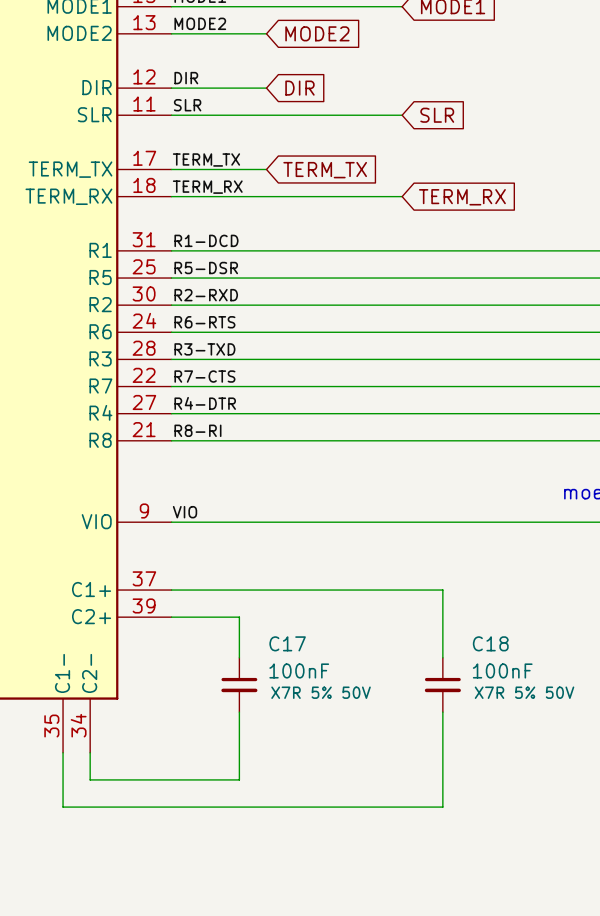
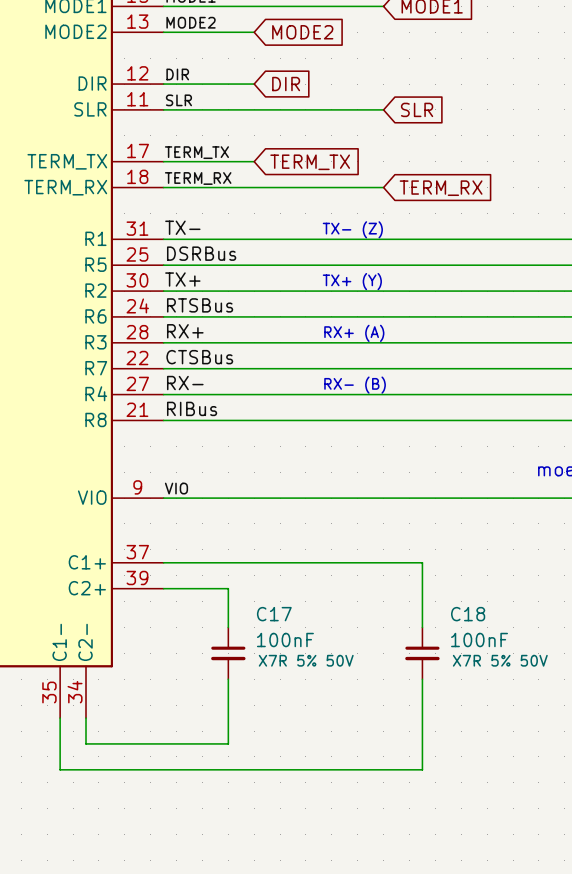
label: R1-DCD (206, 240) -> TX- (182, 227)
text: none -> TX- (Z) (352, 229)
label: R5-DSR (206, 268) -> DSRBus (201, 253)
label: R2-RXD (206, 295) -> TX+ (182, 279)
text: none -> TX+ (Y) (352, 281)
label: R6-RTS (204, 322) -> RTSBus (200, 305)
label: R3-TXD (204, 349) -> RX+ (185, 331)
text: none -> RX+ (A) (354, 333)
label: R7-CTS (204, 376) -> CTSBus (199, 357)
label: R4-DTR (205, 403) -> RX- (185, 383)
text: none -> RX- (B) (355, 385)
label: R8-RI (197, 430) -> RIBus (192, 408)

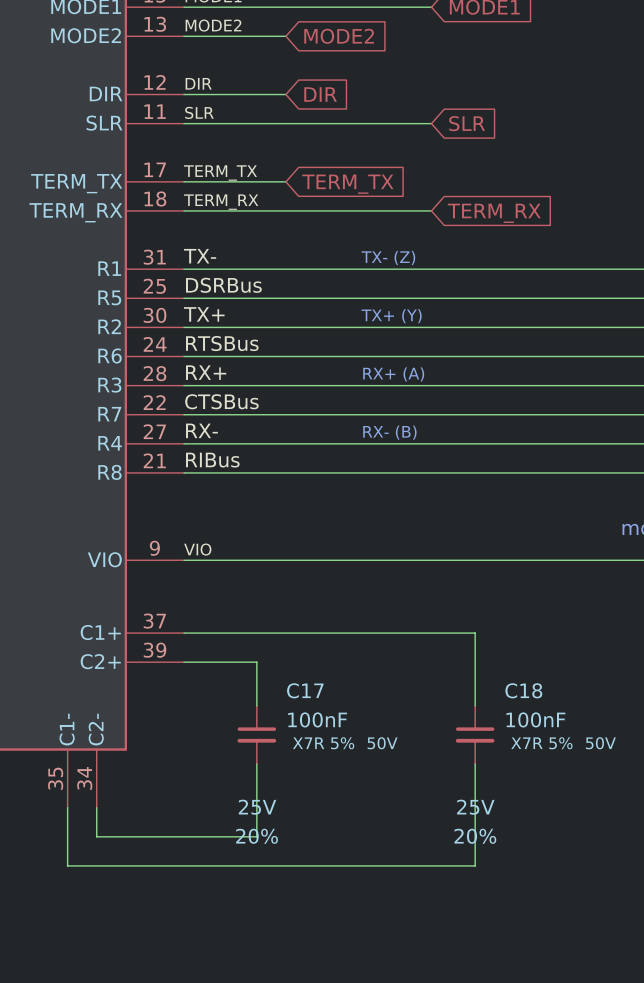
C17 text: none -> 25V (257, 807)
C18 text: none -> 25V (475, 807)
C17 text: none -> 20% (257, 836)
C18 text: none -> 20% (475, 836)

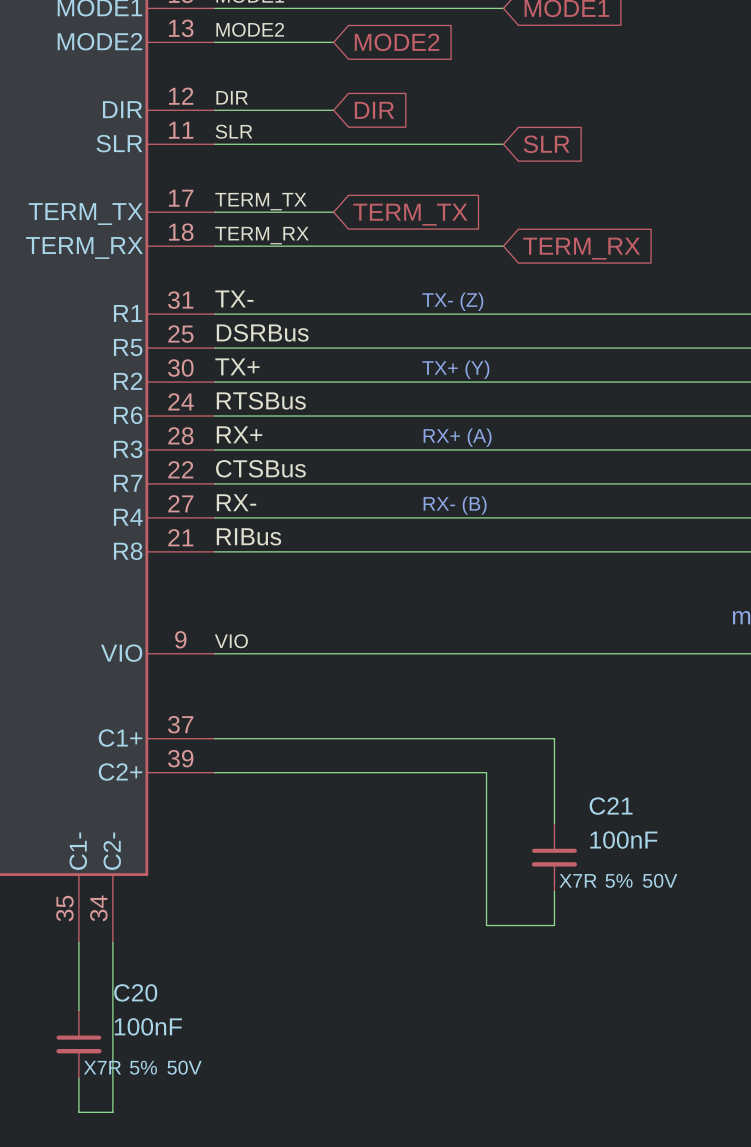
wire: (256, 662) (256, 705) -> (299, 772) (486, 772) (486, 925) (554, 925)
C18 name: C18 (523, 690) -> C21 (611, 806)
C17: 100nF (256, 734) -> none
C18 text: X7R 5% (541, 743) -> X7R (578, 880)
C18 text: 50V (600, 743) -> none
wire: (256, 764) (256, 836) (96, 836) -> (78, 1078) (78, 1112) (112, 1112) (112, 976)
wire: (475, 793) (475, 865) (67, 865) -> none
C18 text: 25V (475, 807) -> 50V (660, 880)
C18 text: 20% (475, 836) -> 5% (619, 880)
C20: none -> 100nF (78, 1044)

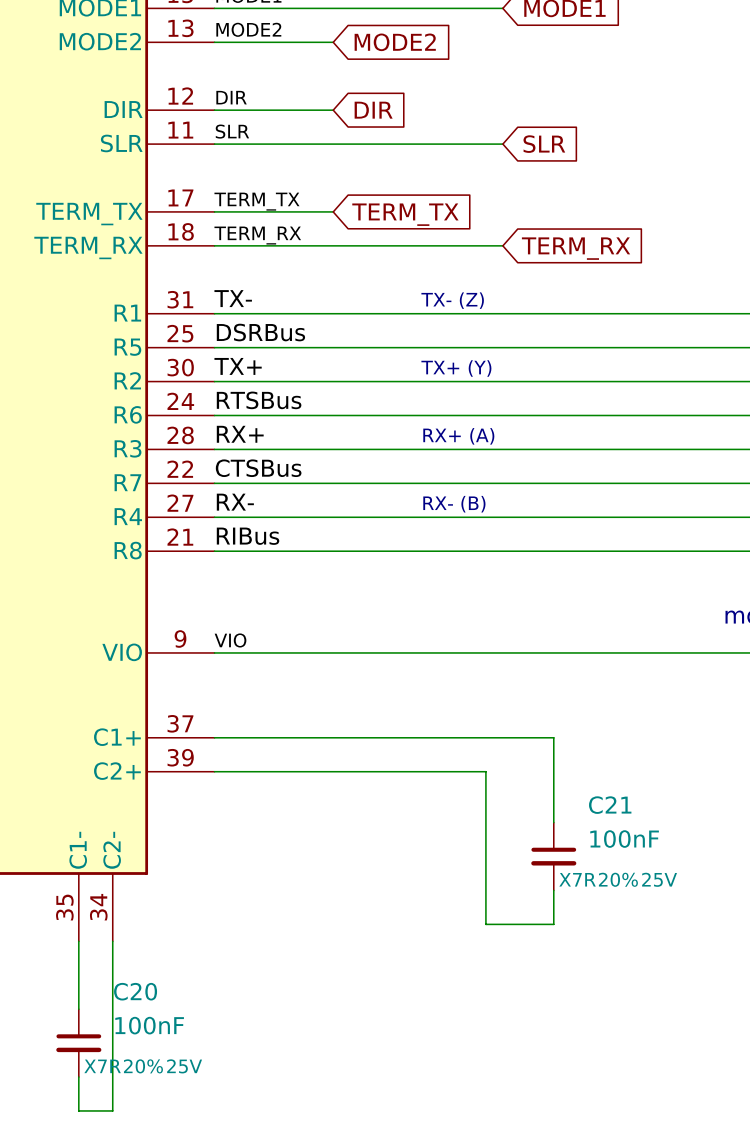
C21 text: 5% (619, 880) -> 20% (618, 879)
C21 text: 50V (660, 880) -> 25V (659, 879)
C20 text: 5% (143, 1067) -> 20% (143, 1066)
C20 text: 50V (184, 1067) -> 25V (184, 1066)

